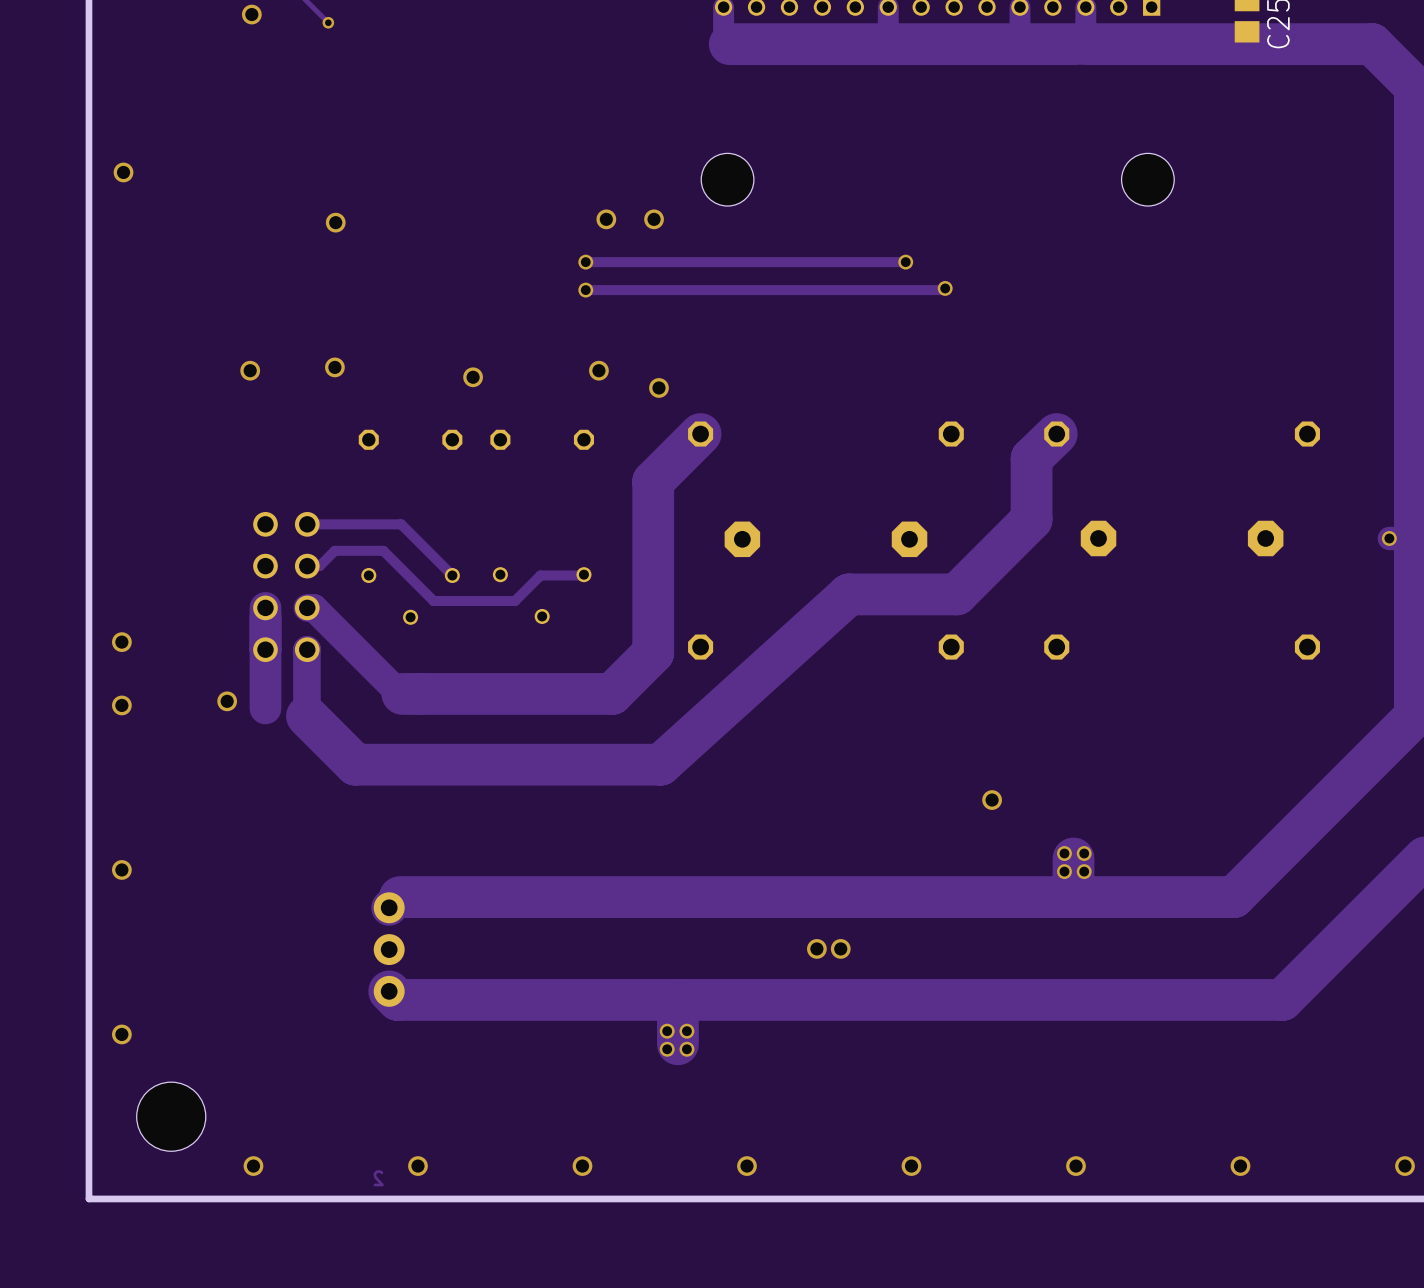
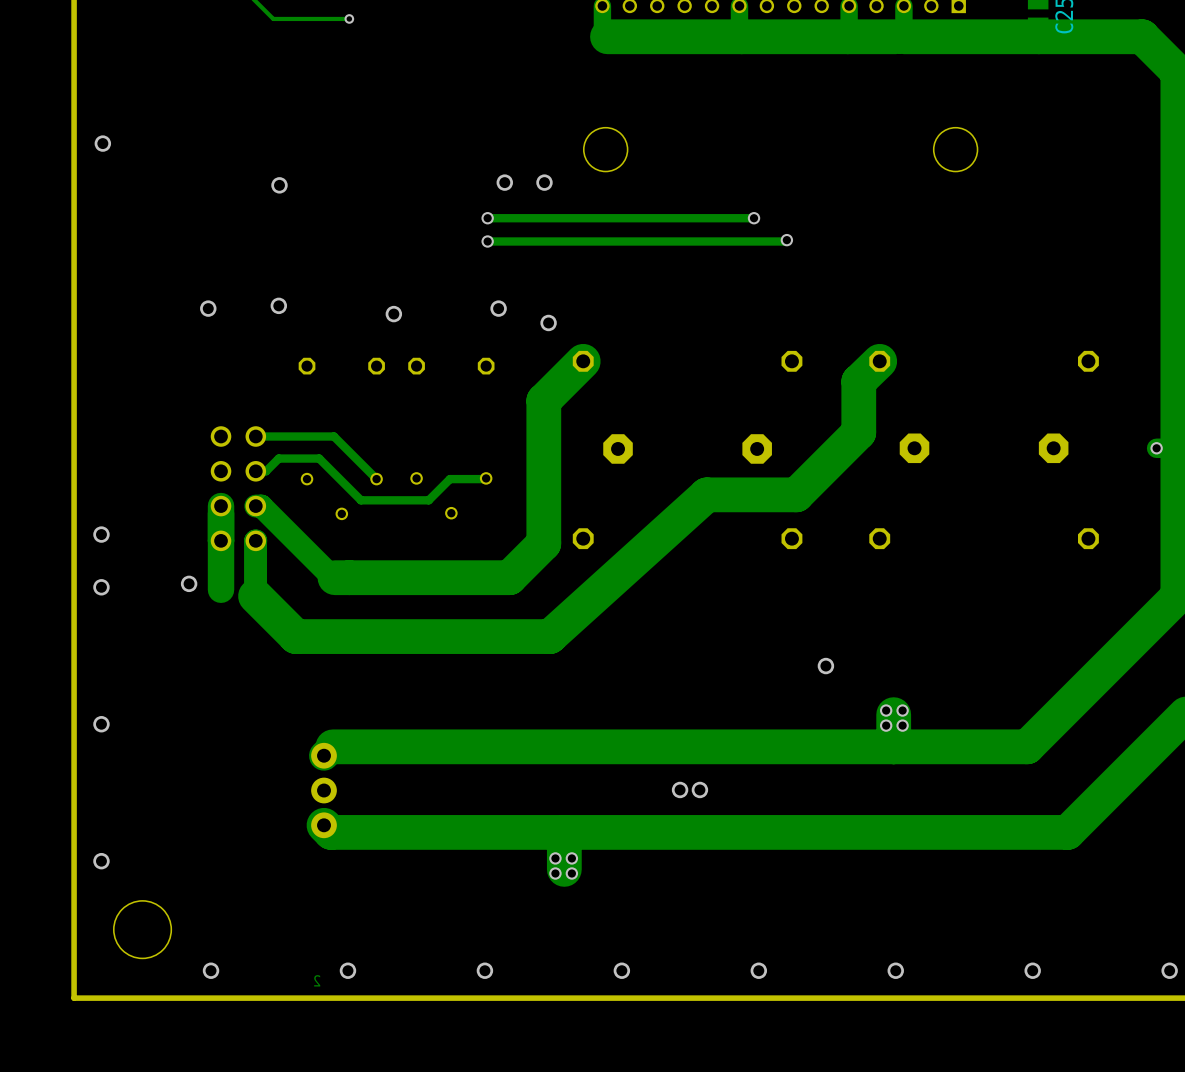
via: (251, 14) -> none
via position: (328, 22) -> (349, 18)
track: none -> (349, 18) (273, 18)

